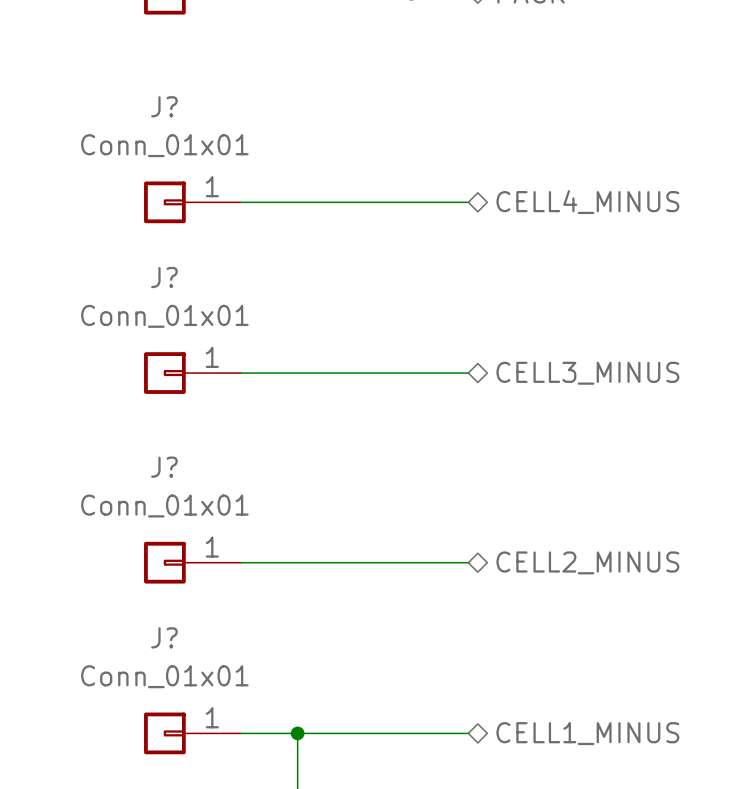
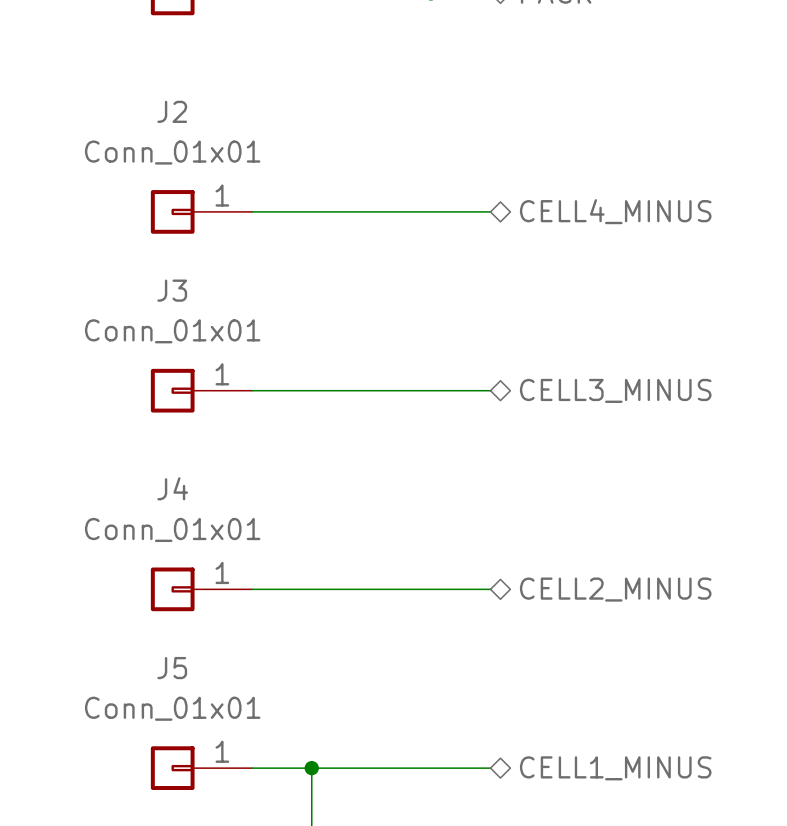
J? name: J? (164, 106) -> J2 (172, 111)
J? name: J? (164, 277) -> J3 (172, 290)
J? name: J? (164, 467) -> J4 (172, 488)
J? name: J? (164, 637) -> J5 (172, 668)

